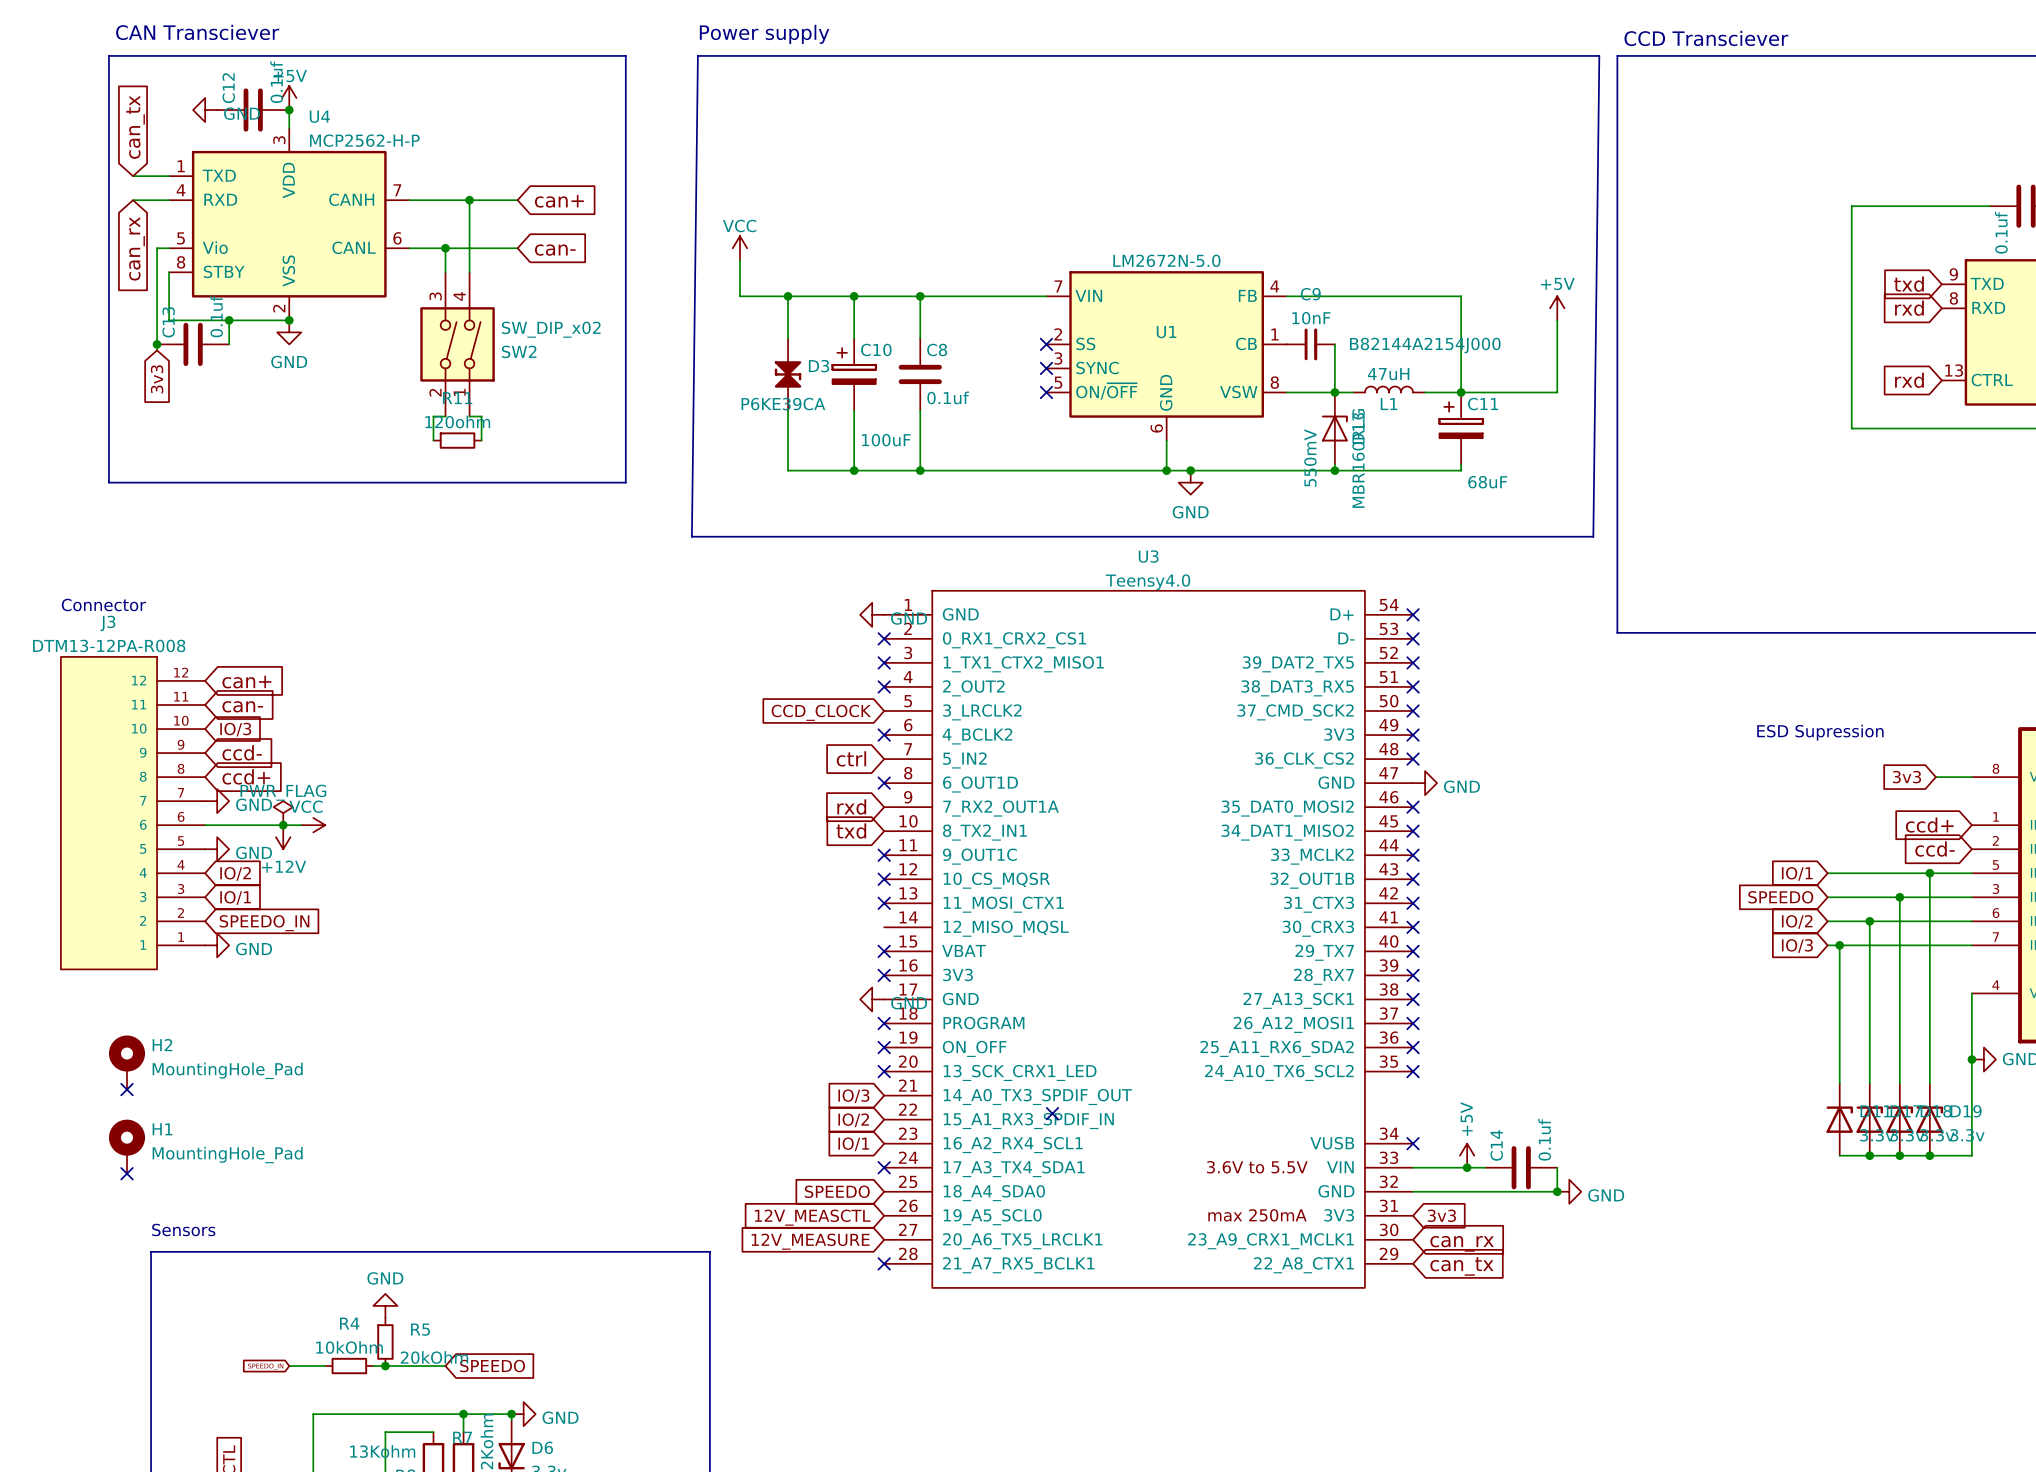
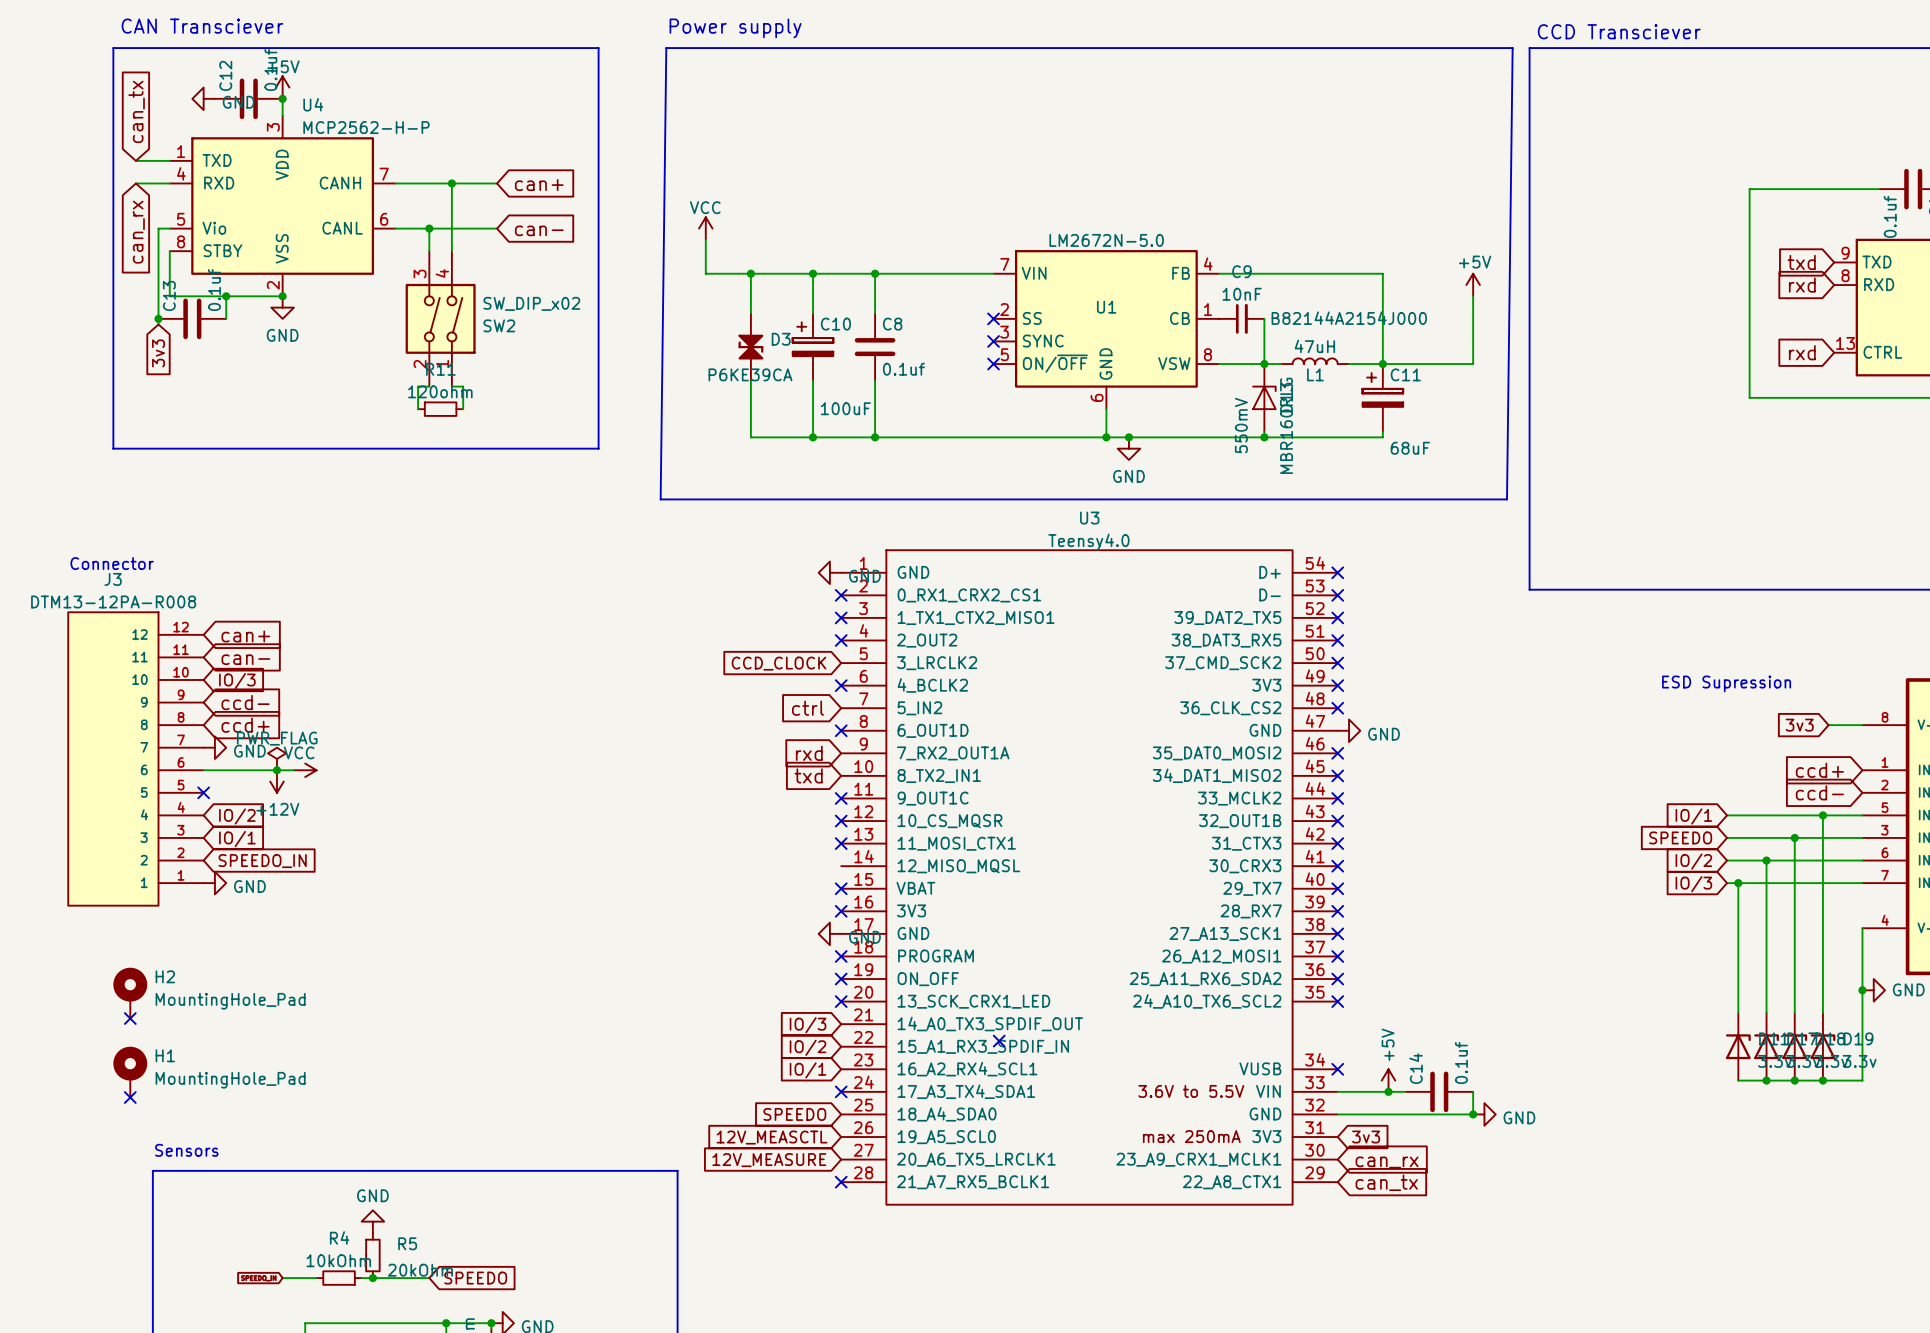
no-connect mark: none -> (203, 792)
power symbol: GND (217, 849) -> none

